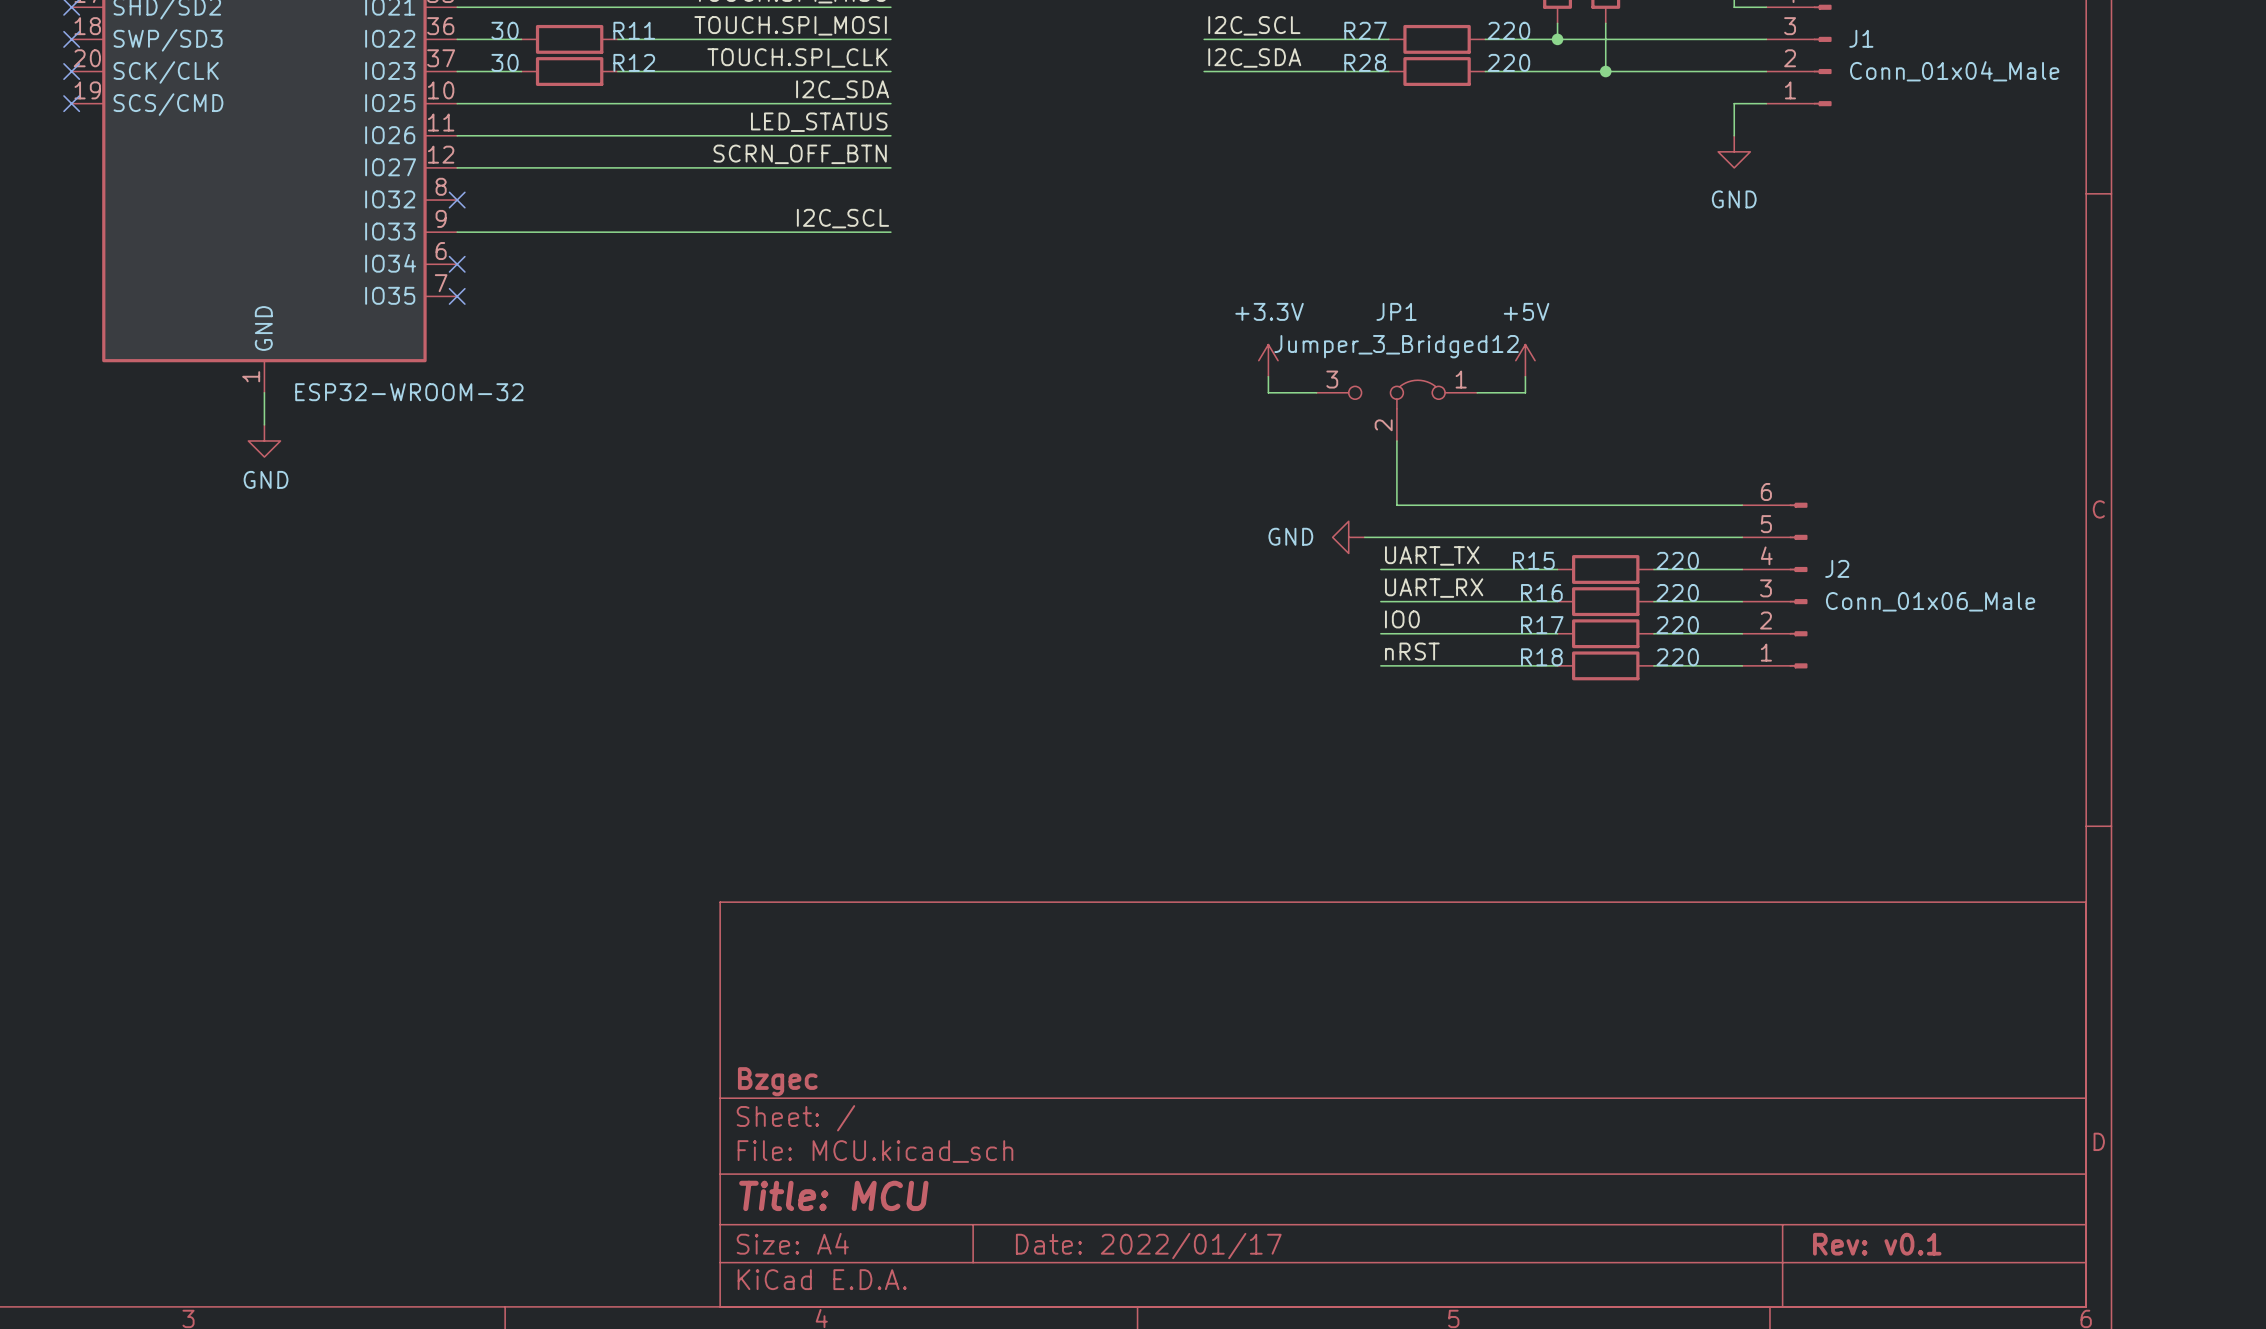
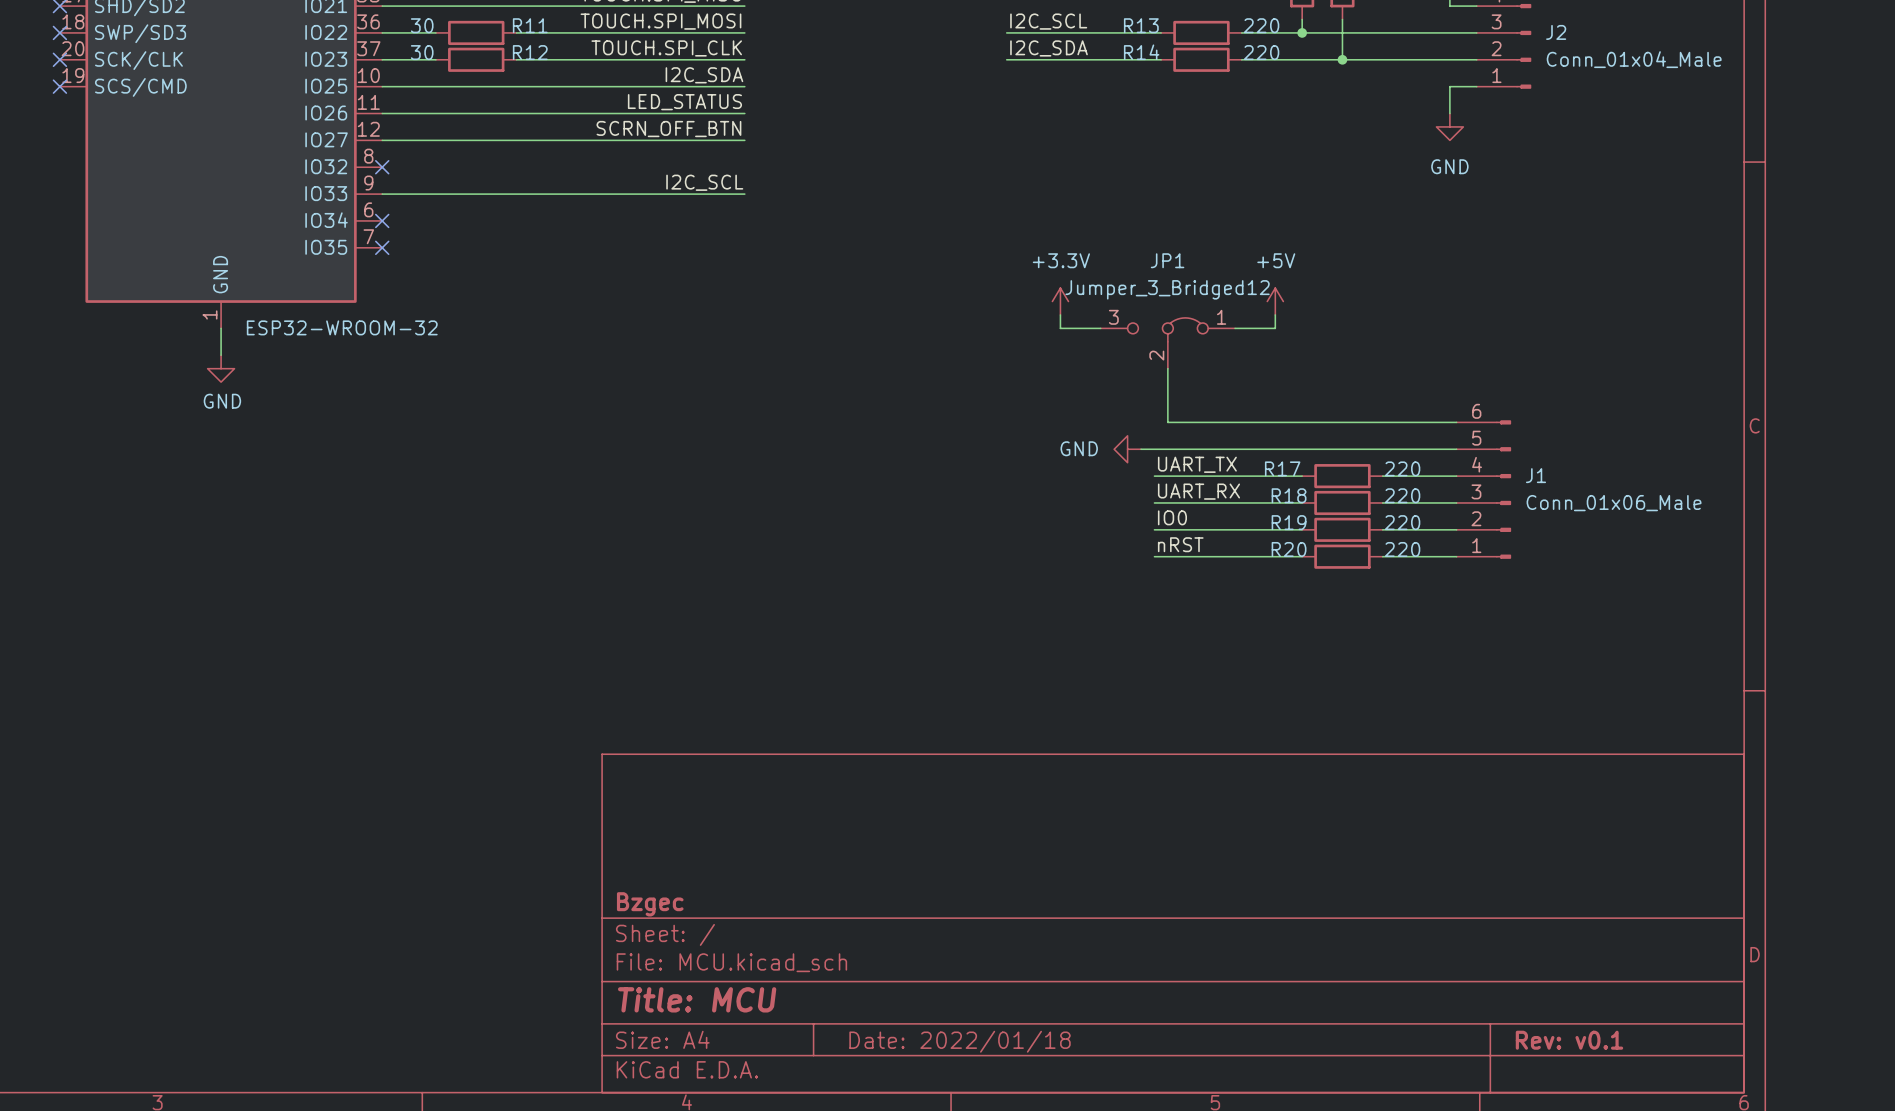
R27 name: R27 (1365, 30) -> R13 (1141, 25)
J1 name: J1 (1861, 38) -> J2 (1556, 32)
R28 name: R28 (1365, 62) -> R14 (1141, 52)
R15 name: R15 (1533, 560) -> R17 (1282, 468)
J2 name: J2 (1837, 568) -> J1 (1536, 475)
R16 name: R16 (1541, 592) -> R18 (1289, 495)
R17 name: R17 (1542, 625) -> R19 (1289, 522)
R18 name: R18 (1541, 657) -> R20 (1289, 549)
title block: Date: 2022/01/17 (1148, 1246) -> Date: 2022/01/18 (960, 1041)

